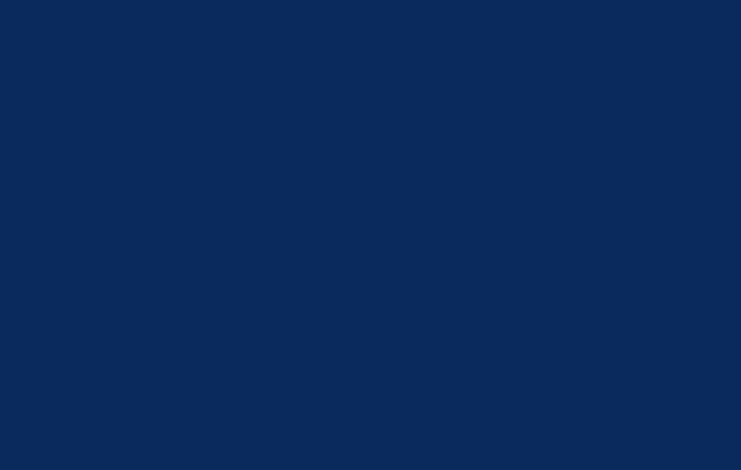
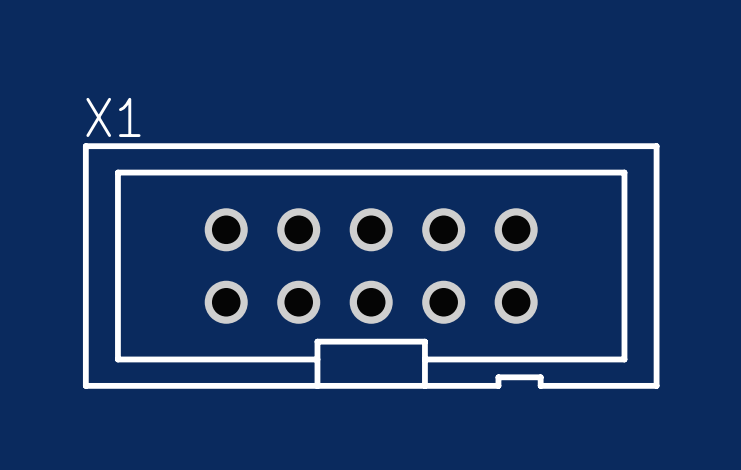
X1: none -> (371, 266)

